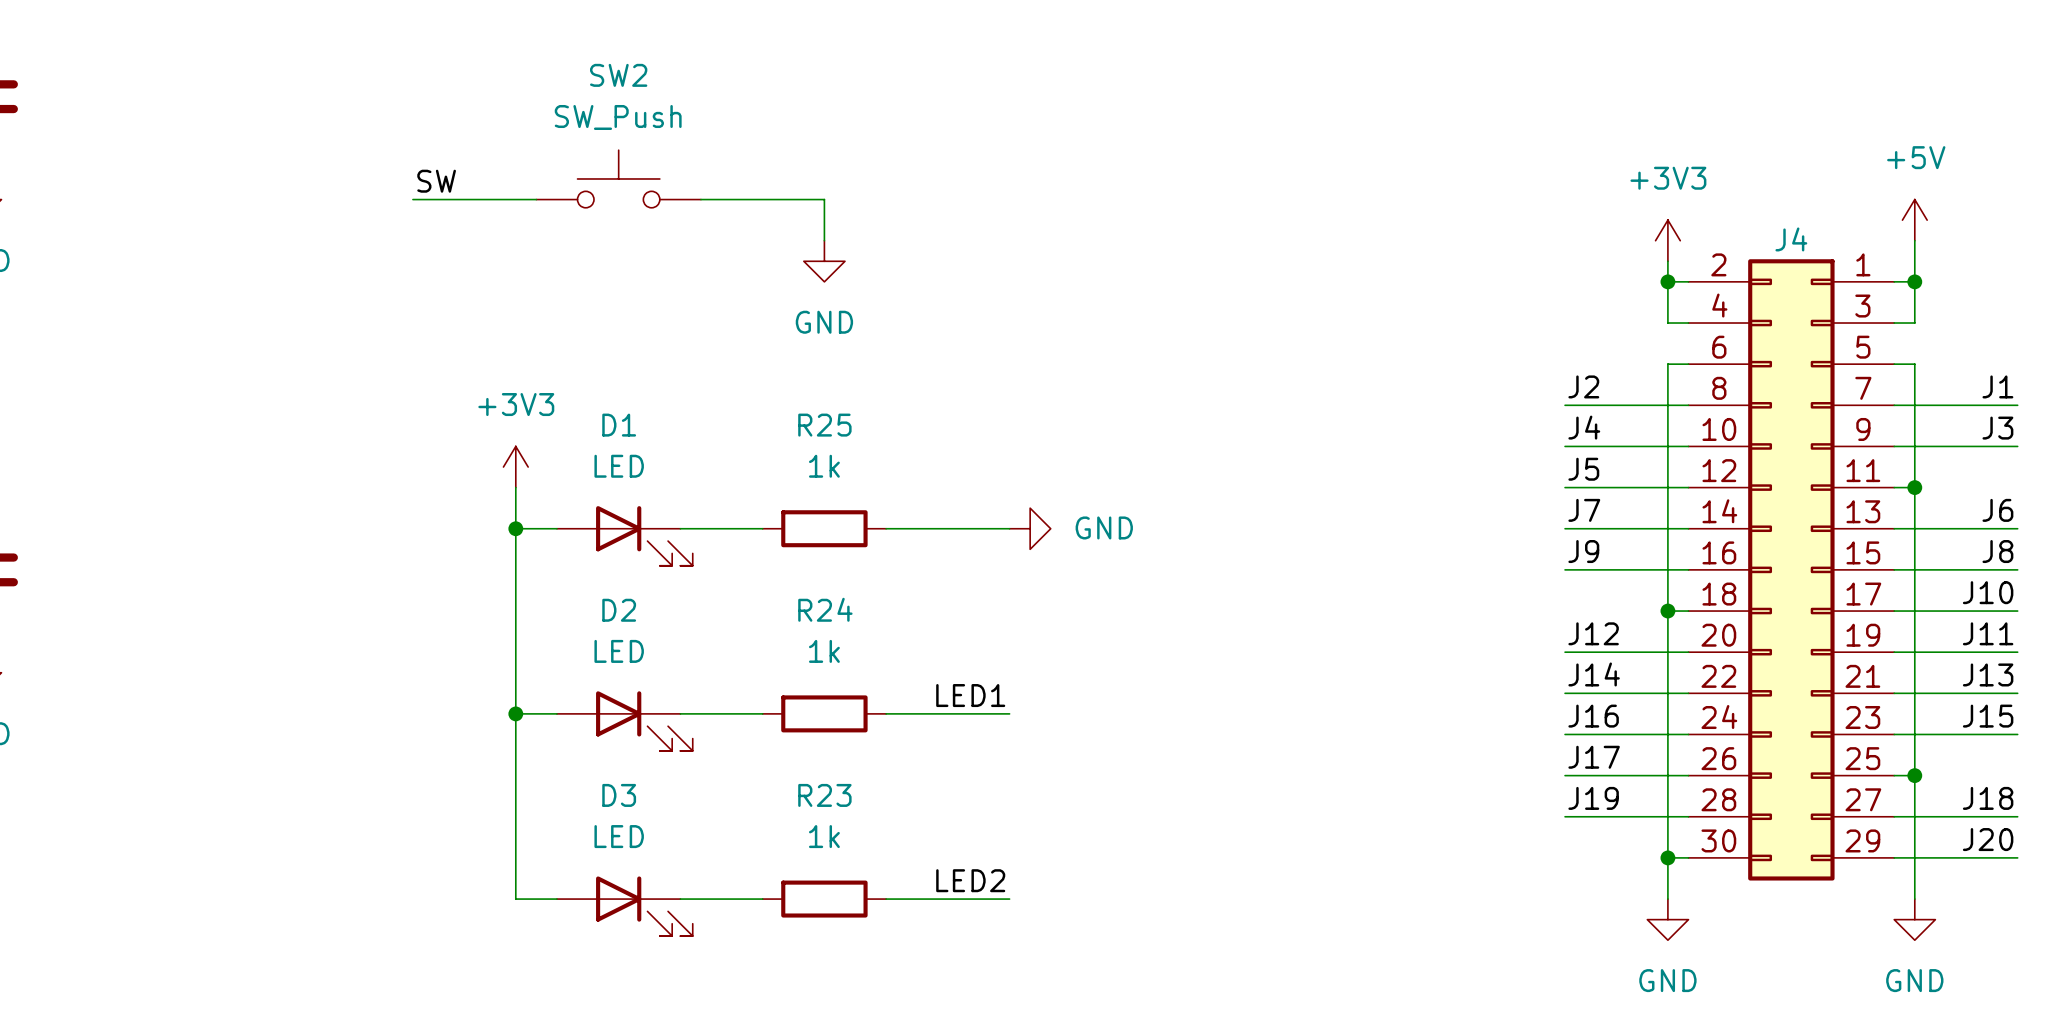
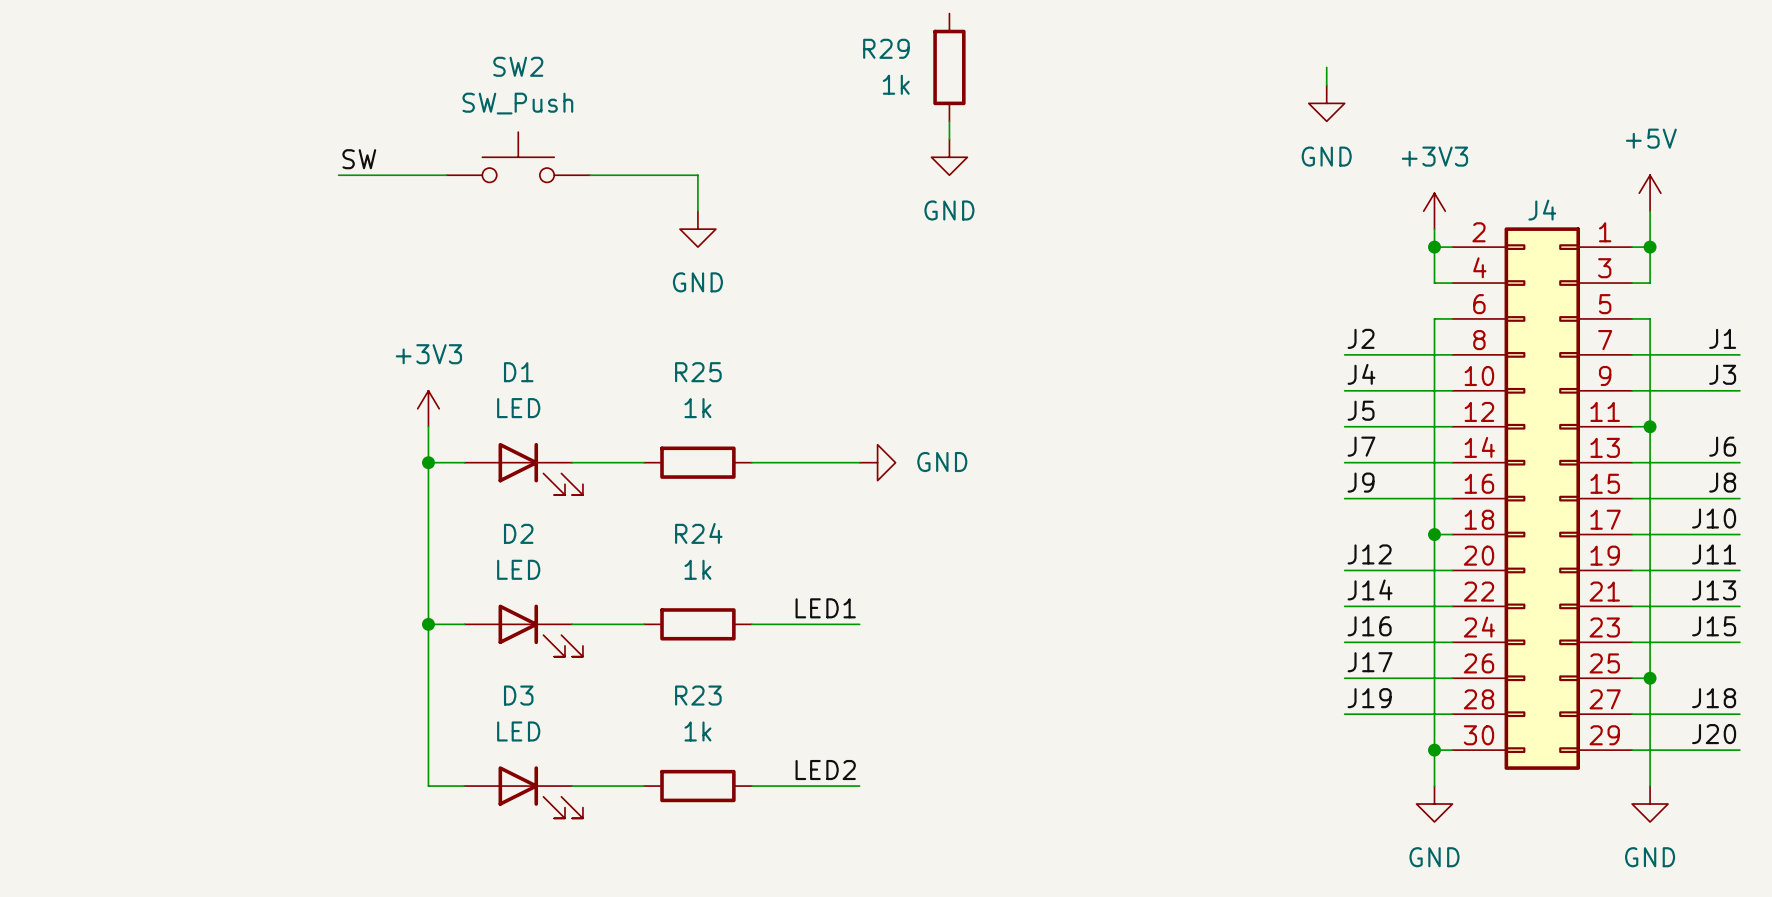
R29: none -> 1k (949, 67)
wire: none -> (1326, 67) (1326, 85)
power symbol: none -> GND (1326, 103)
wire: none -> (949, 121) (949, 139)
power symbol: none -> GND (949, 157)

